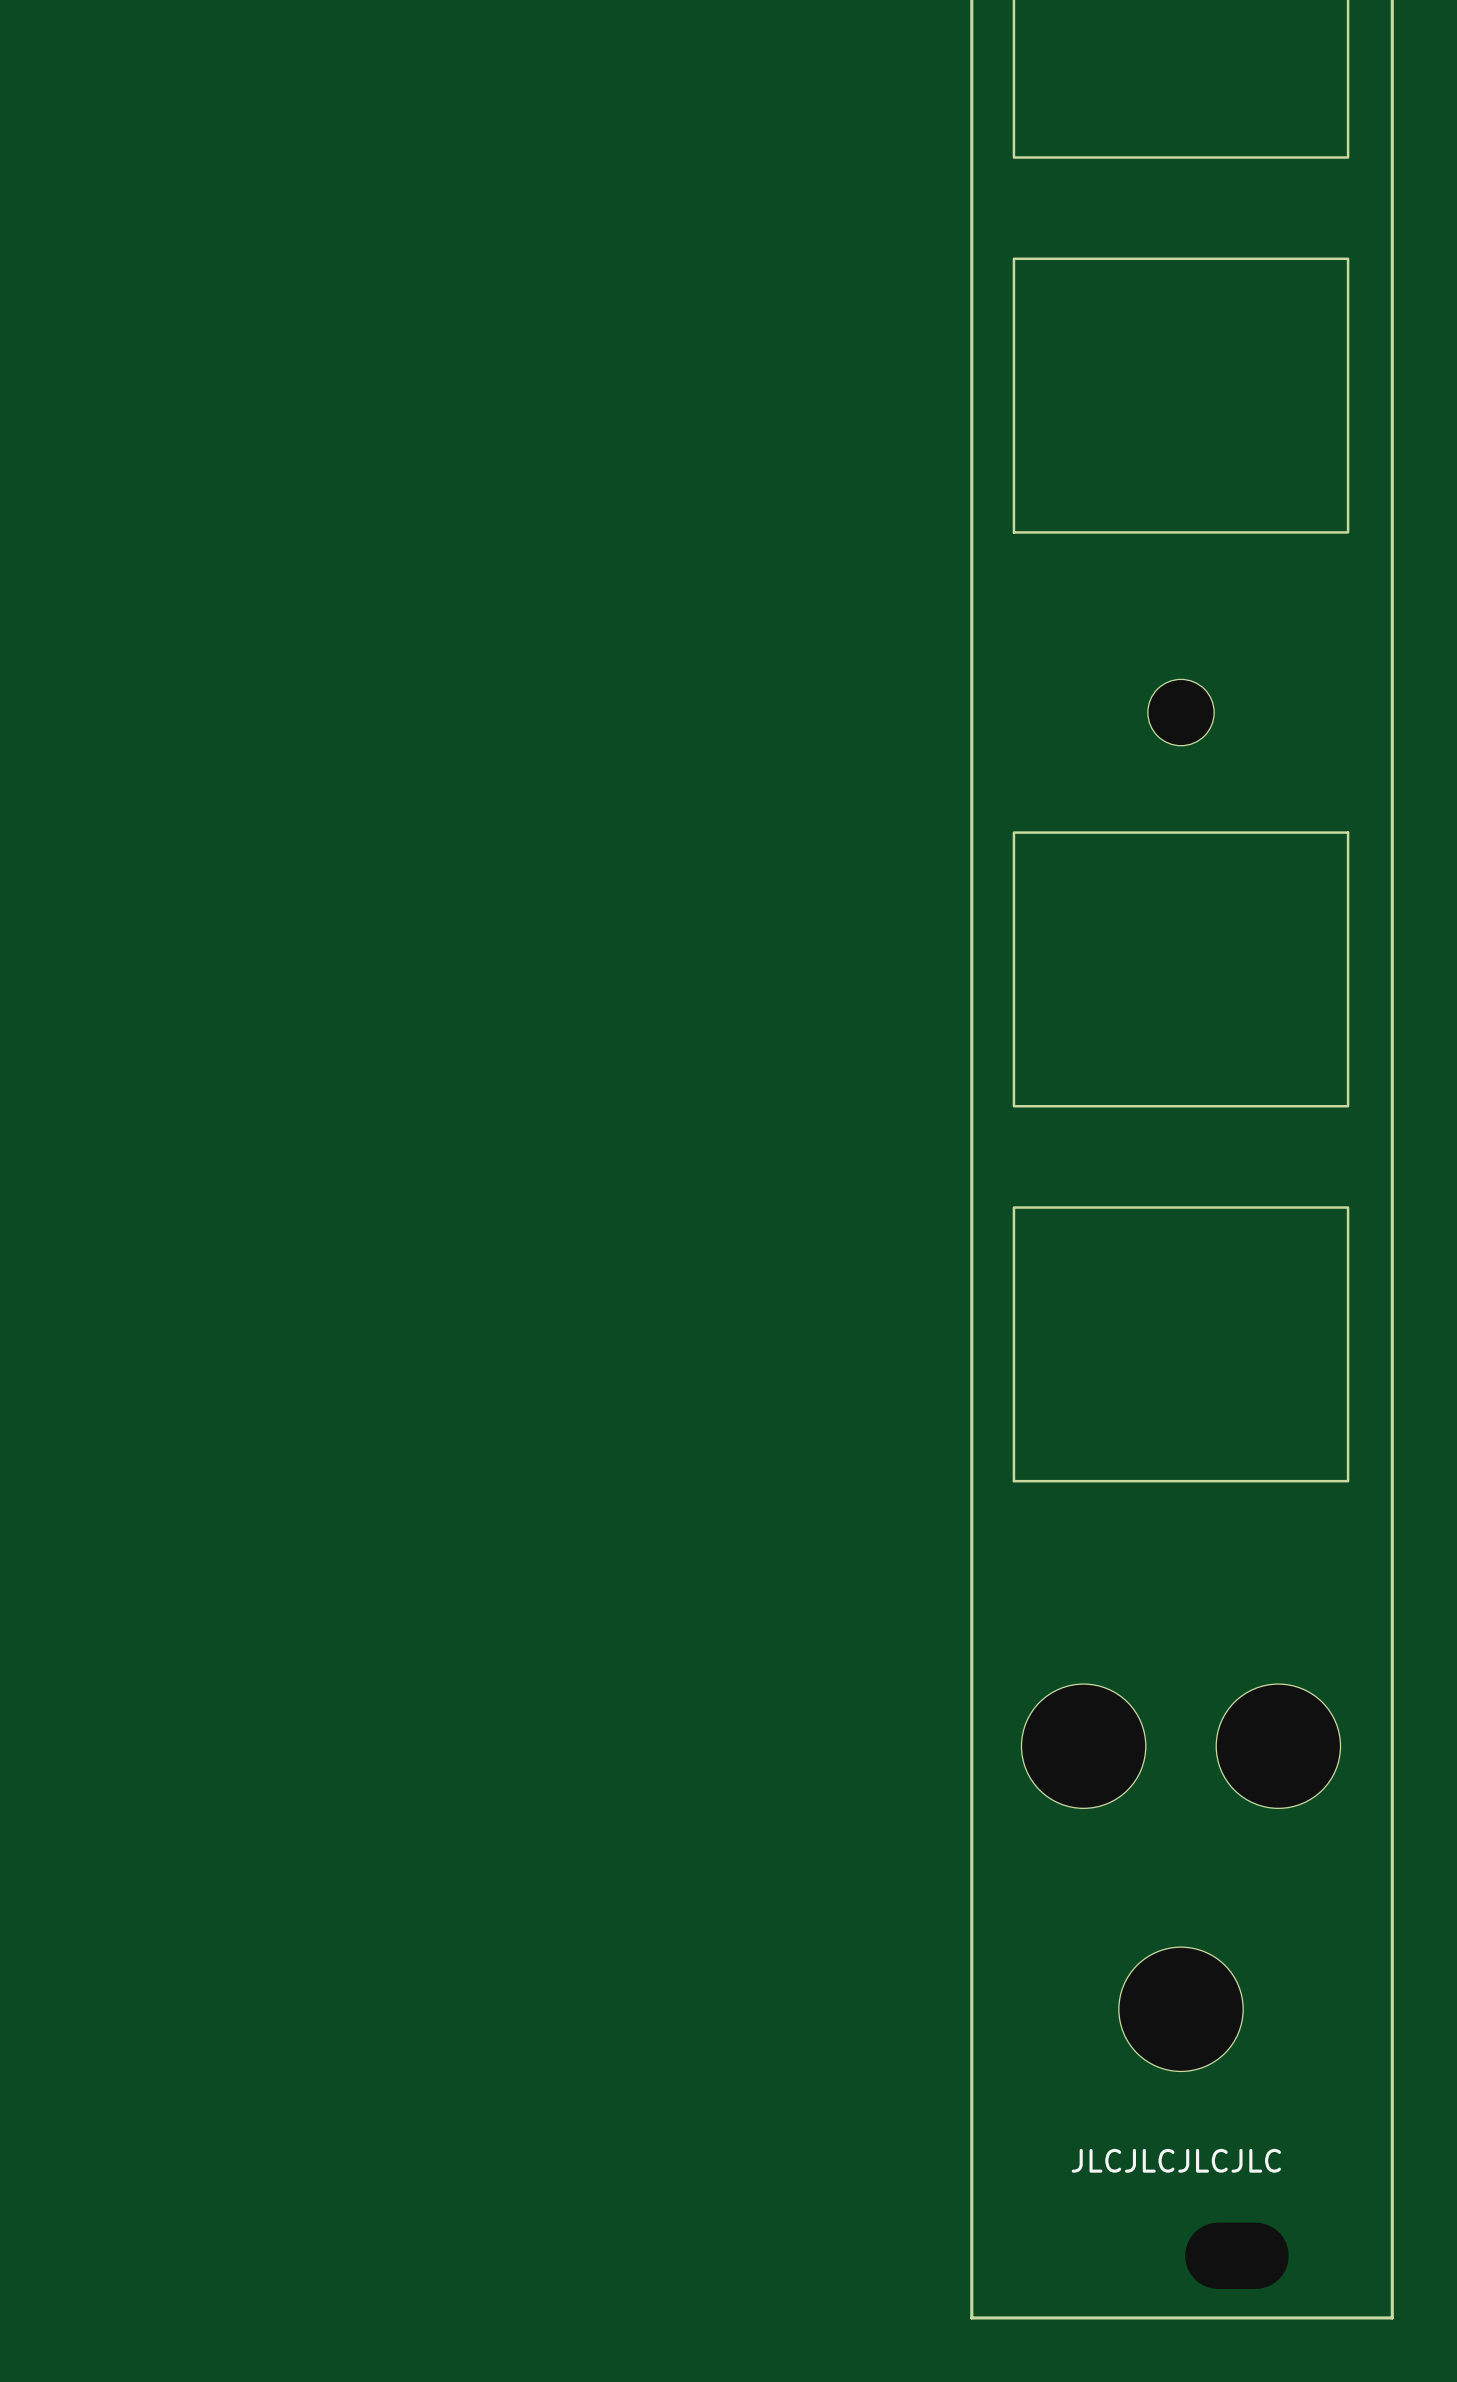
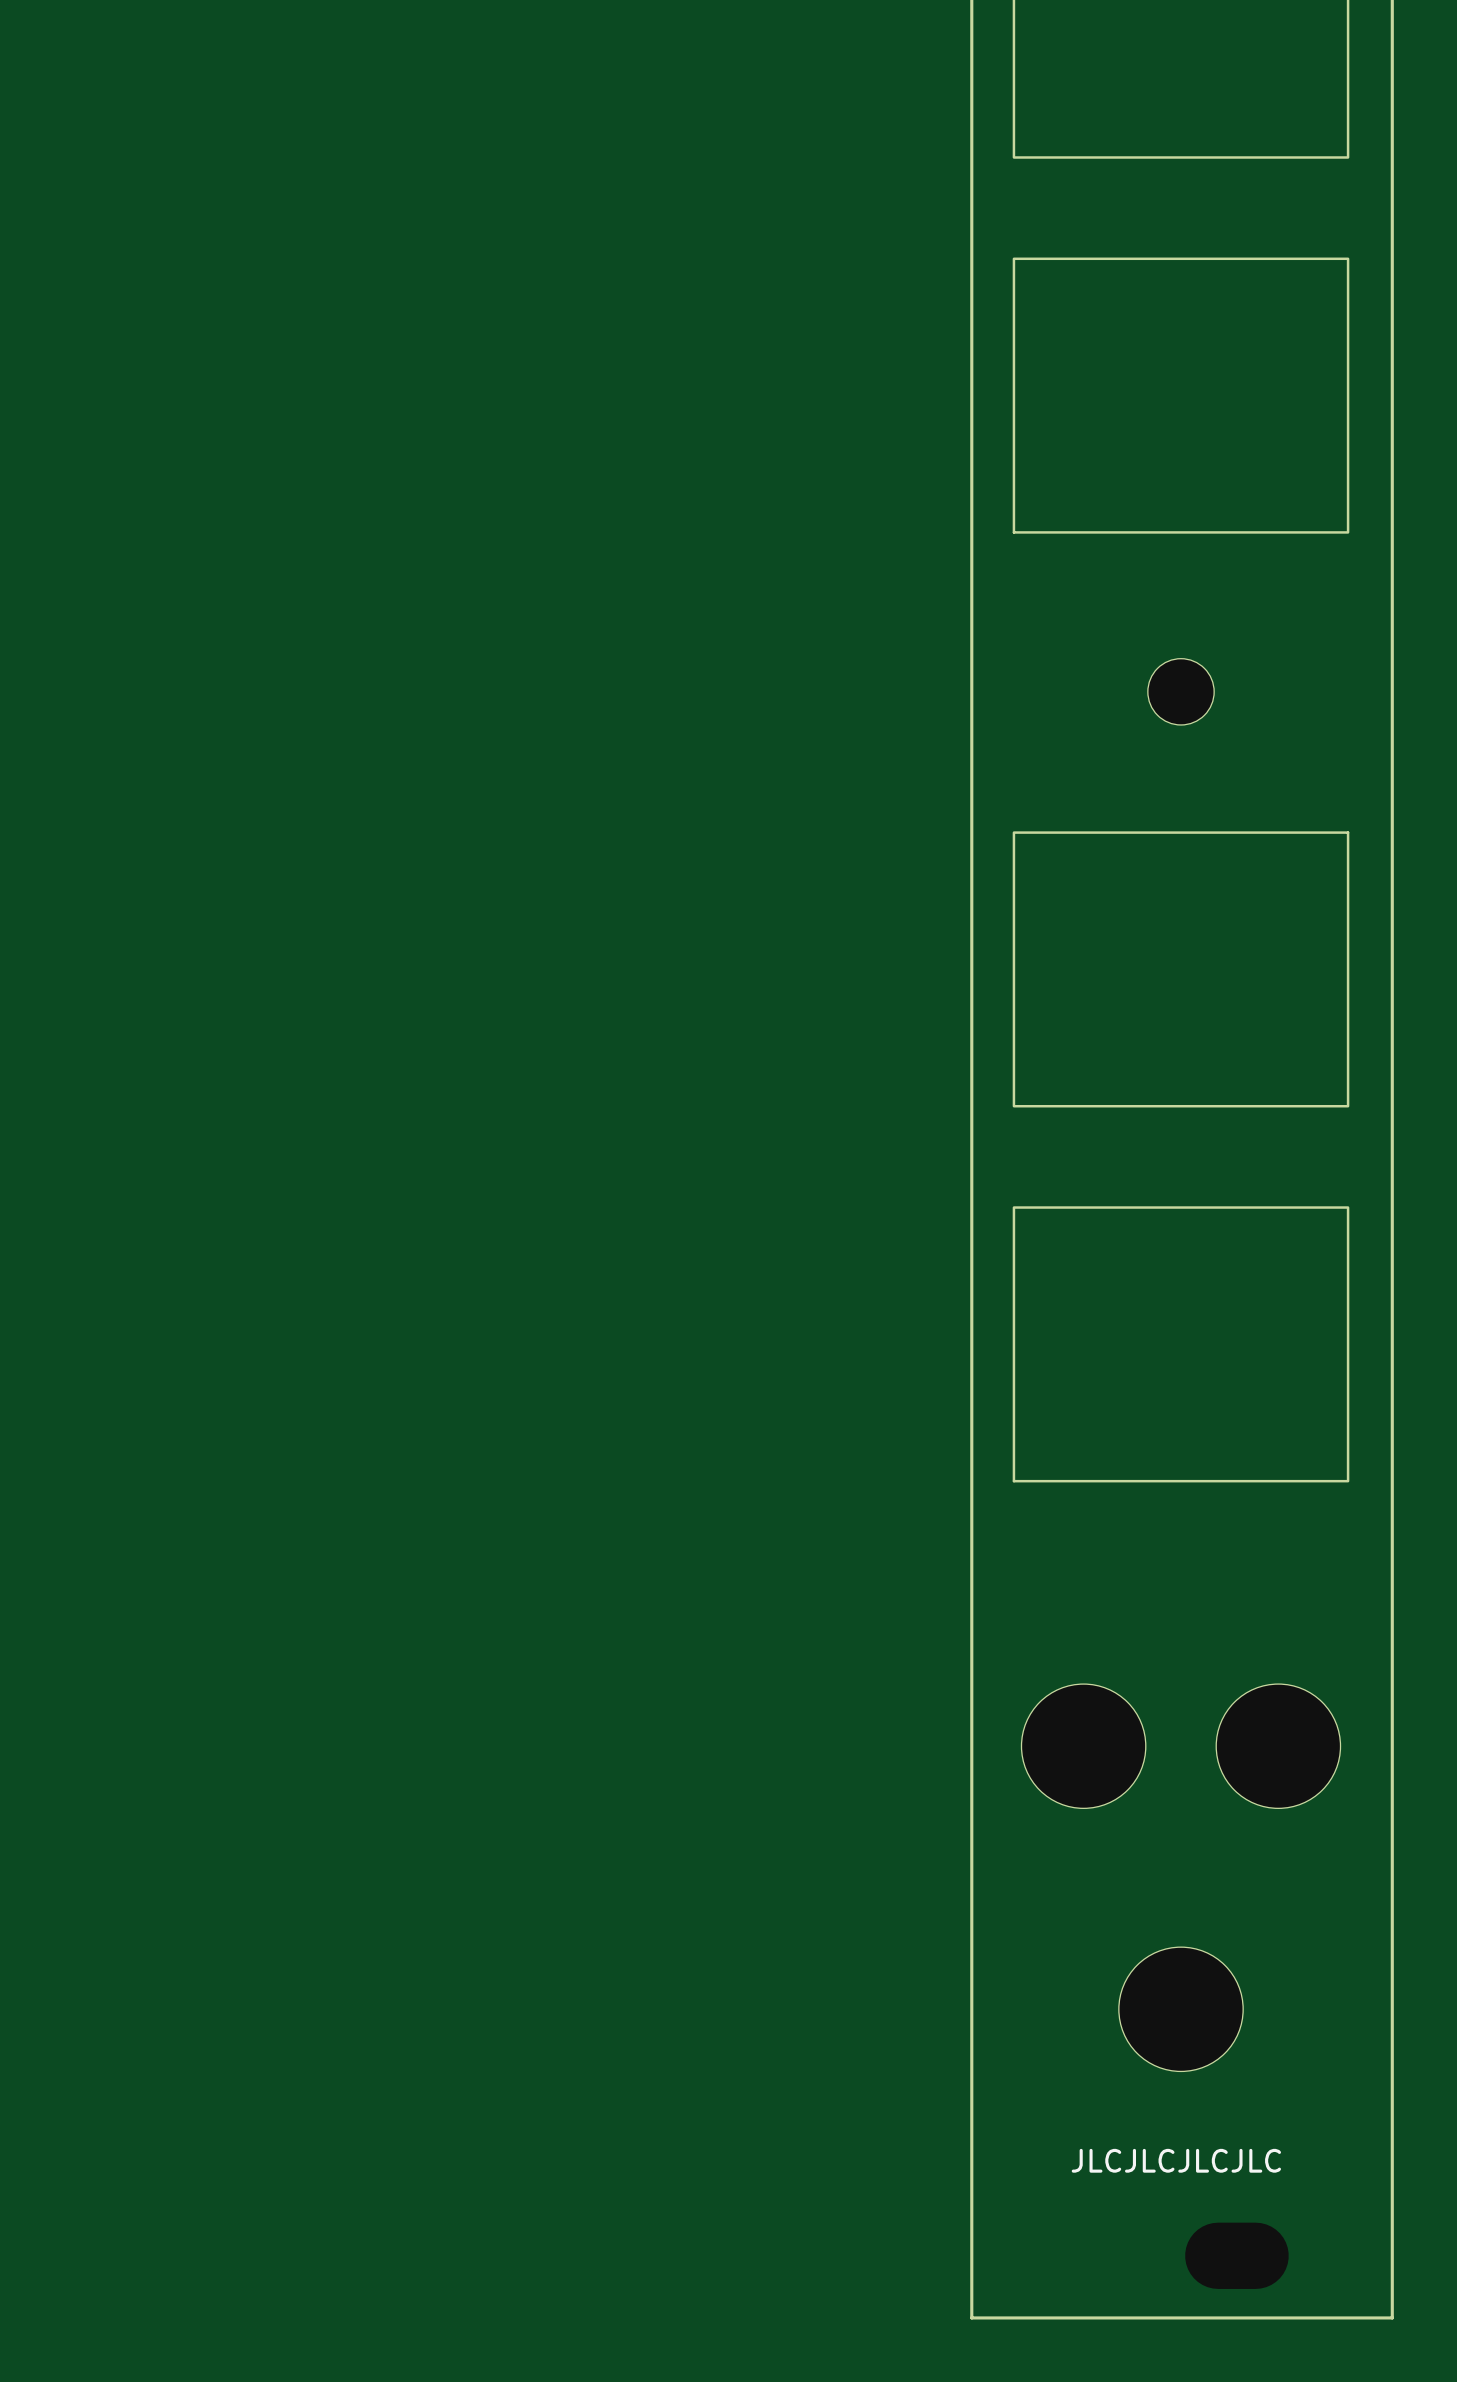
part position: (1181, 712) -> (1181, 691)

